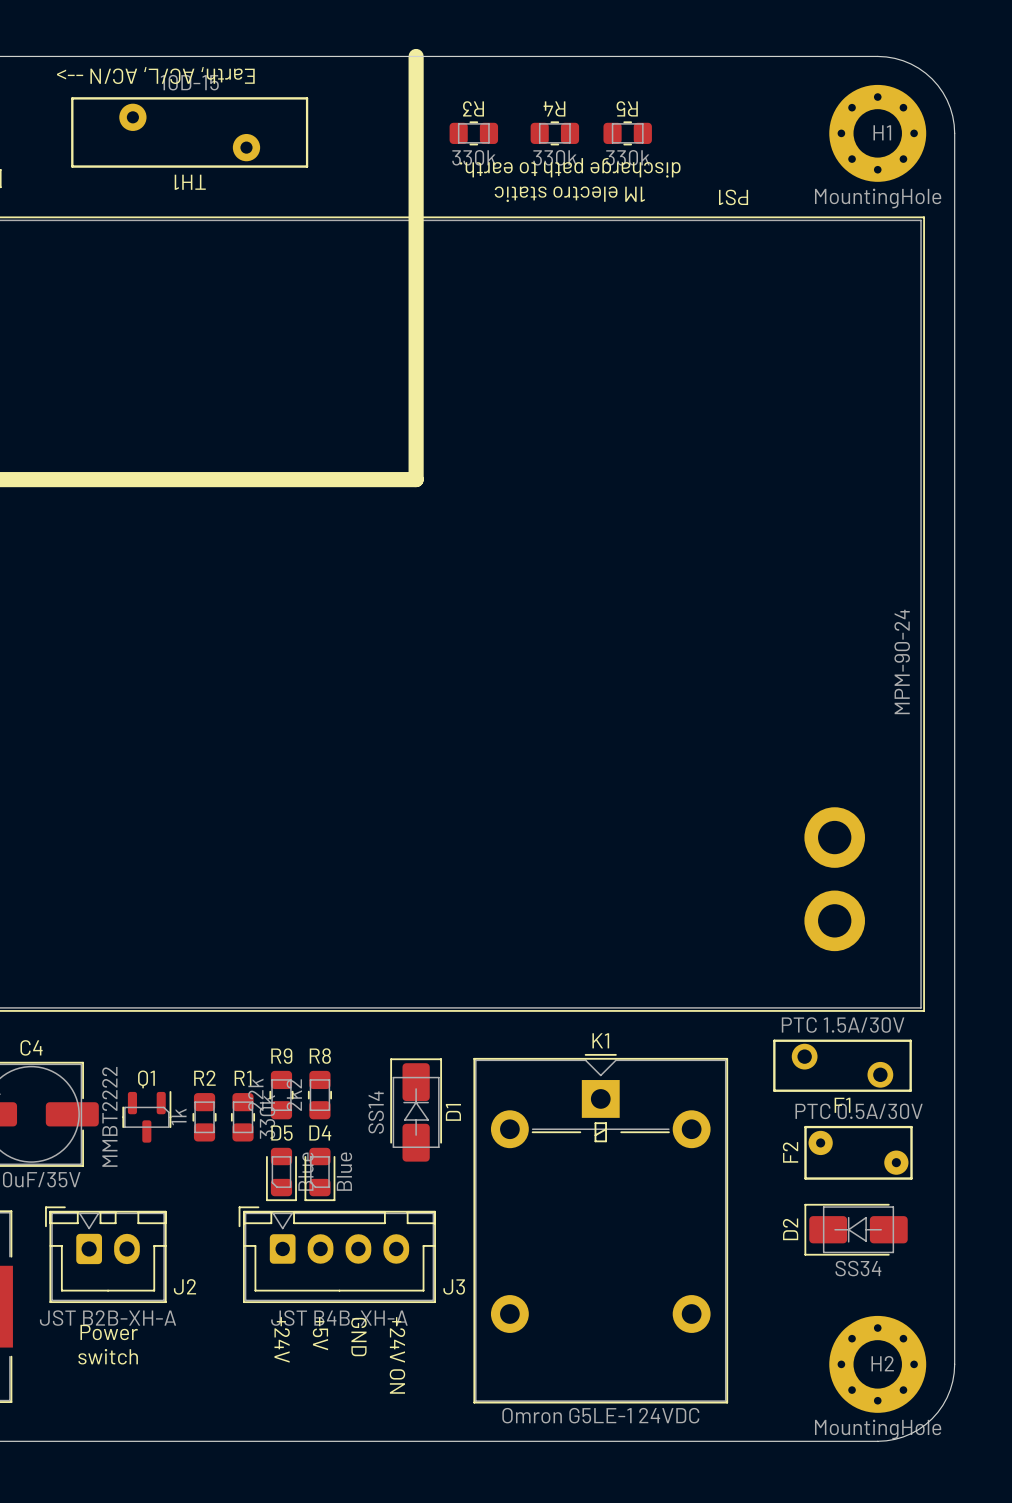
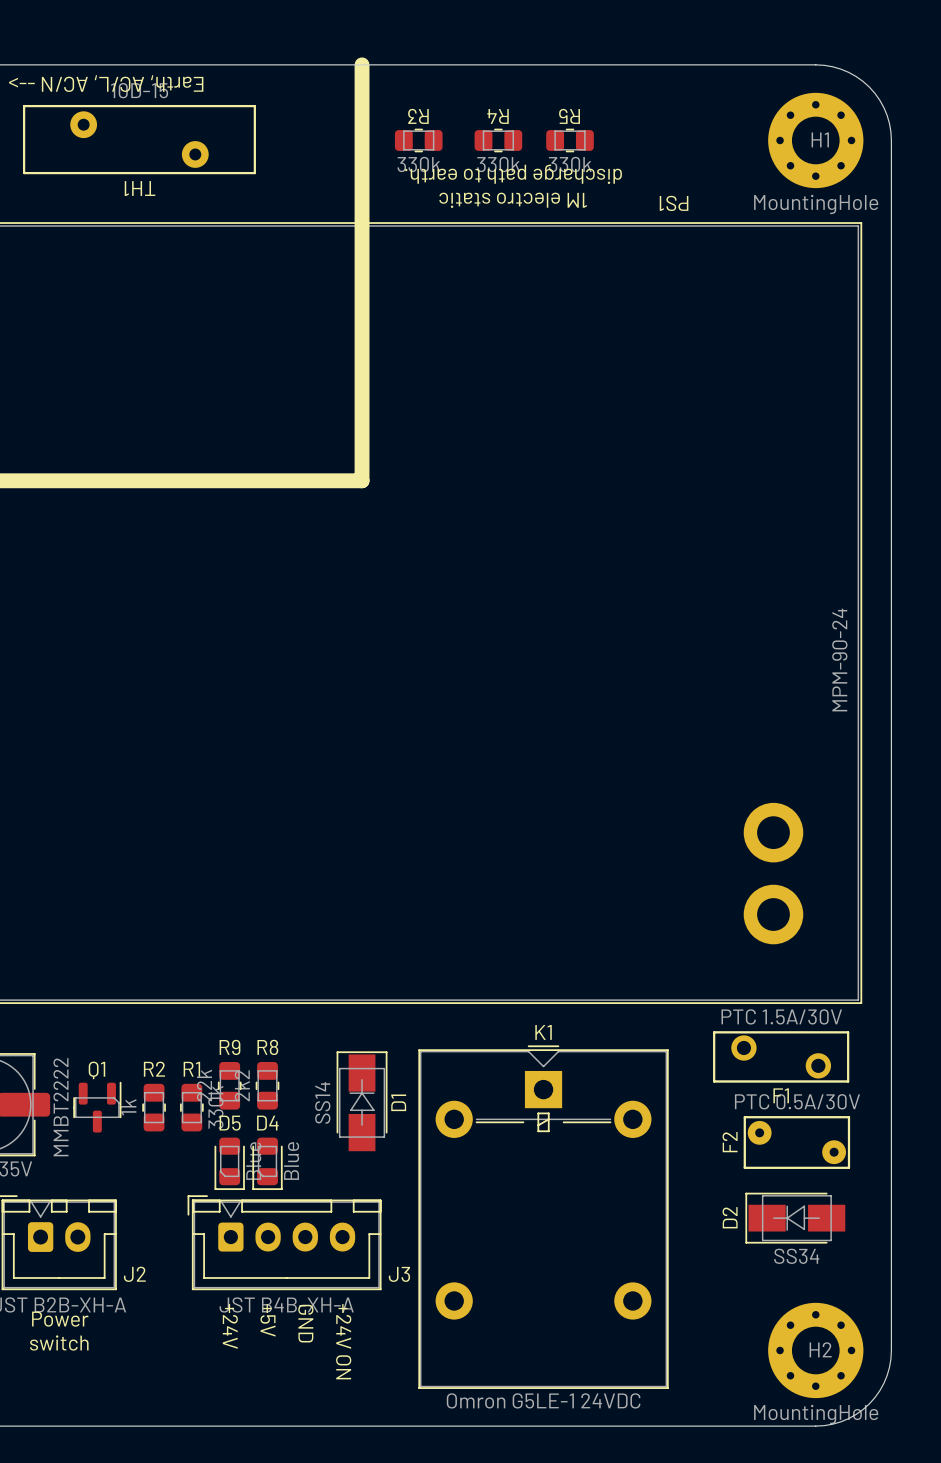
D1 footprint: [390, 1058, 443, 1162] -> [336, 1051, 388, 1152]
D2 footprint: [804, 1203, 908, 1256] -> [745, 1192, 846, 1244]

